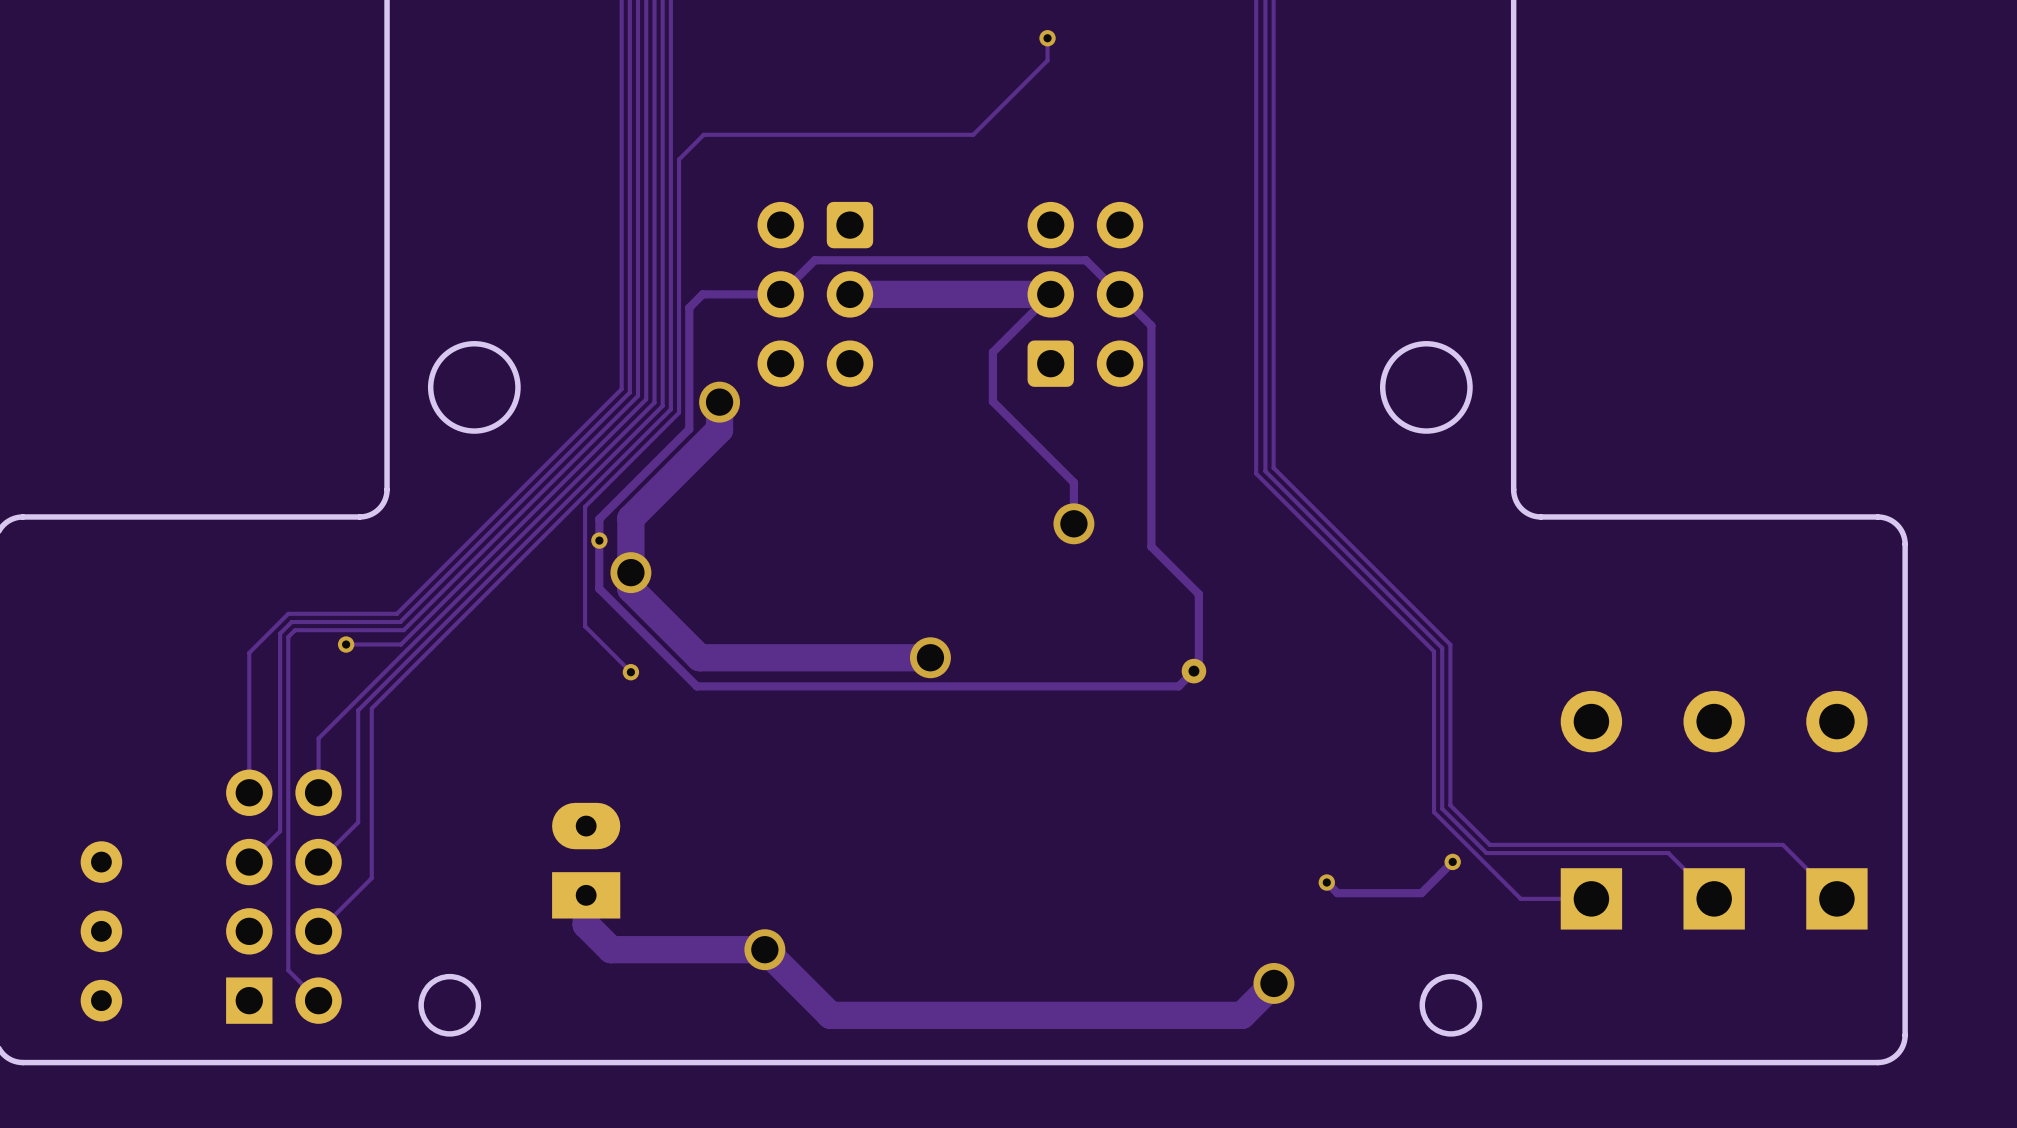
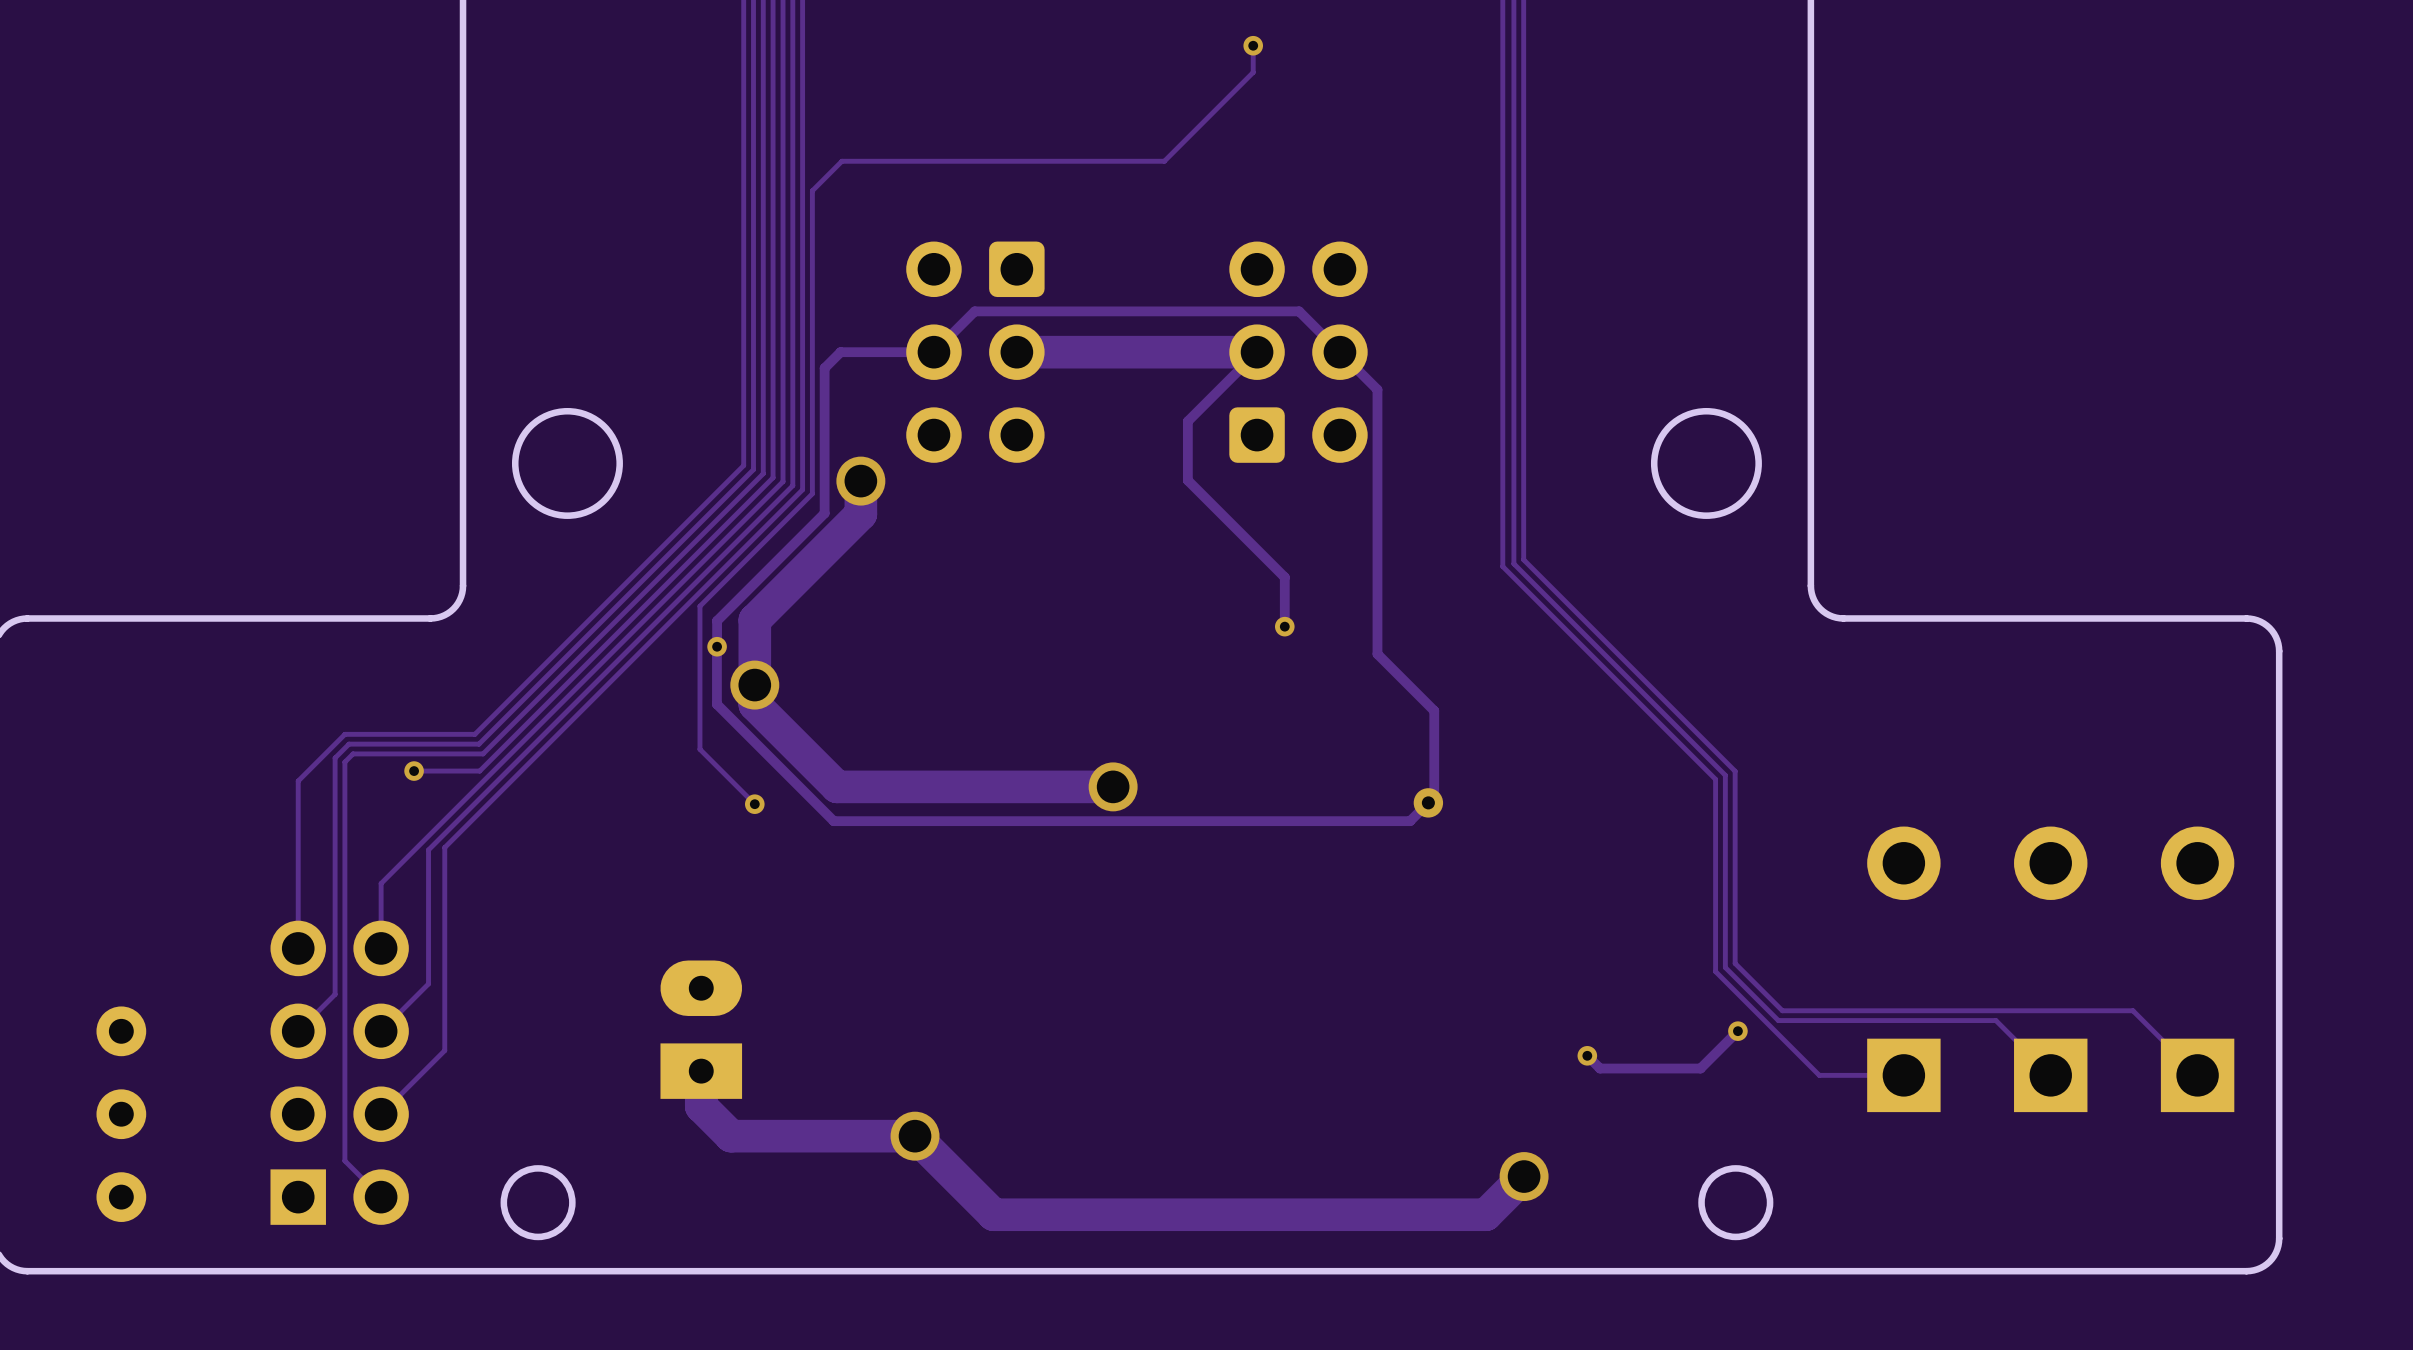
via size: [1053, 503, 1095, 545] -> [1275, 616, 1295, 637]

